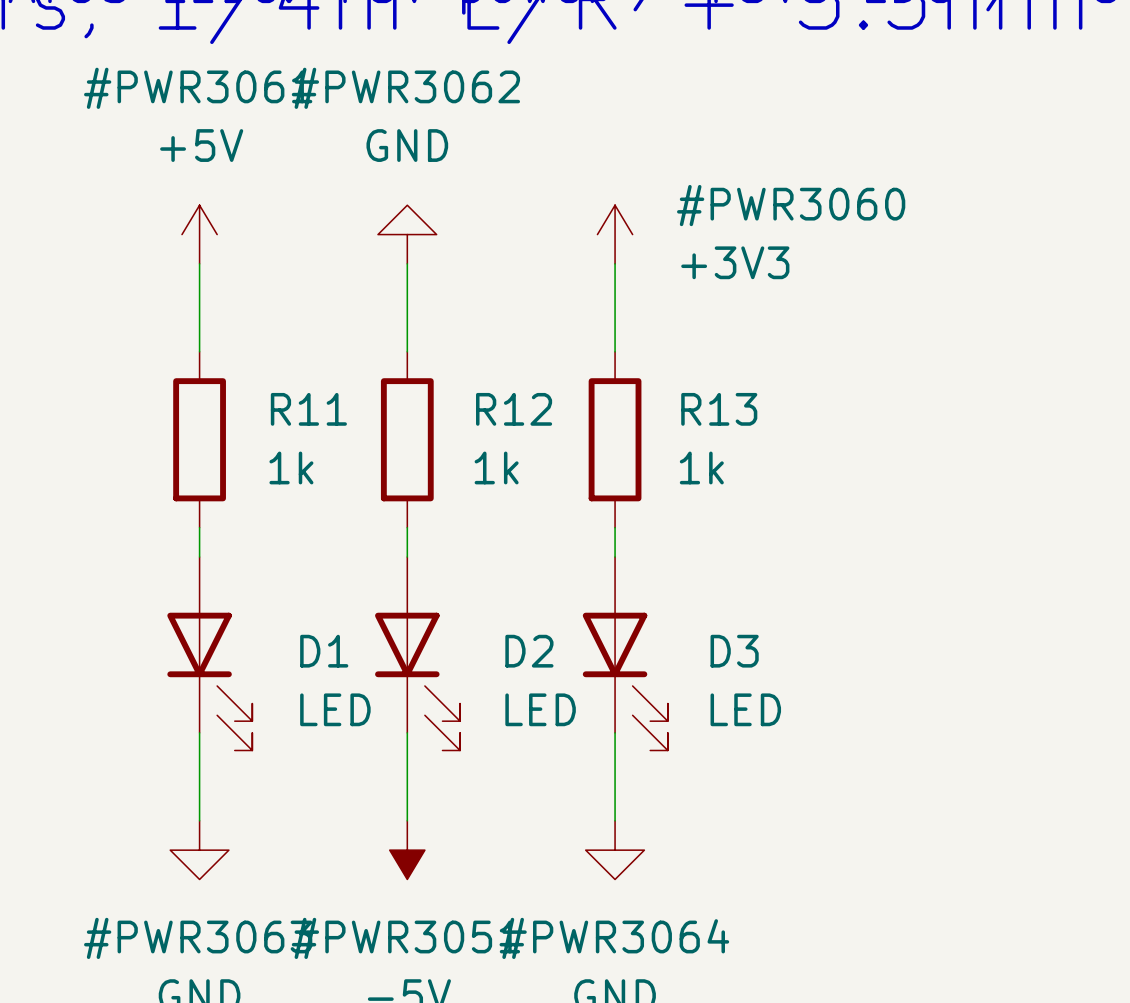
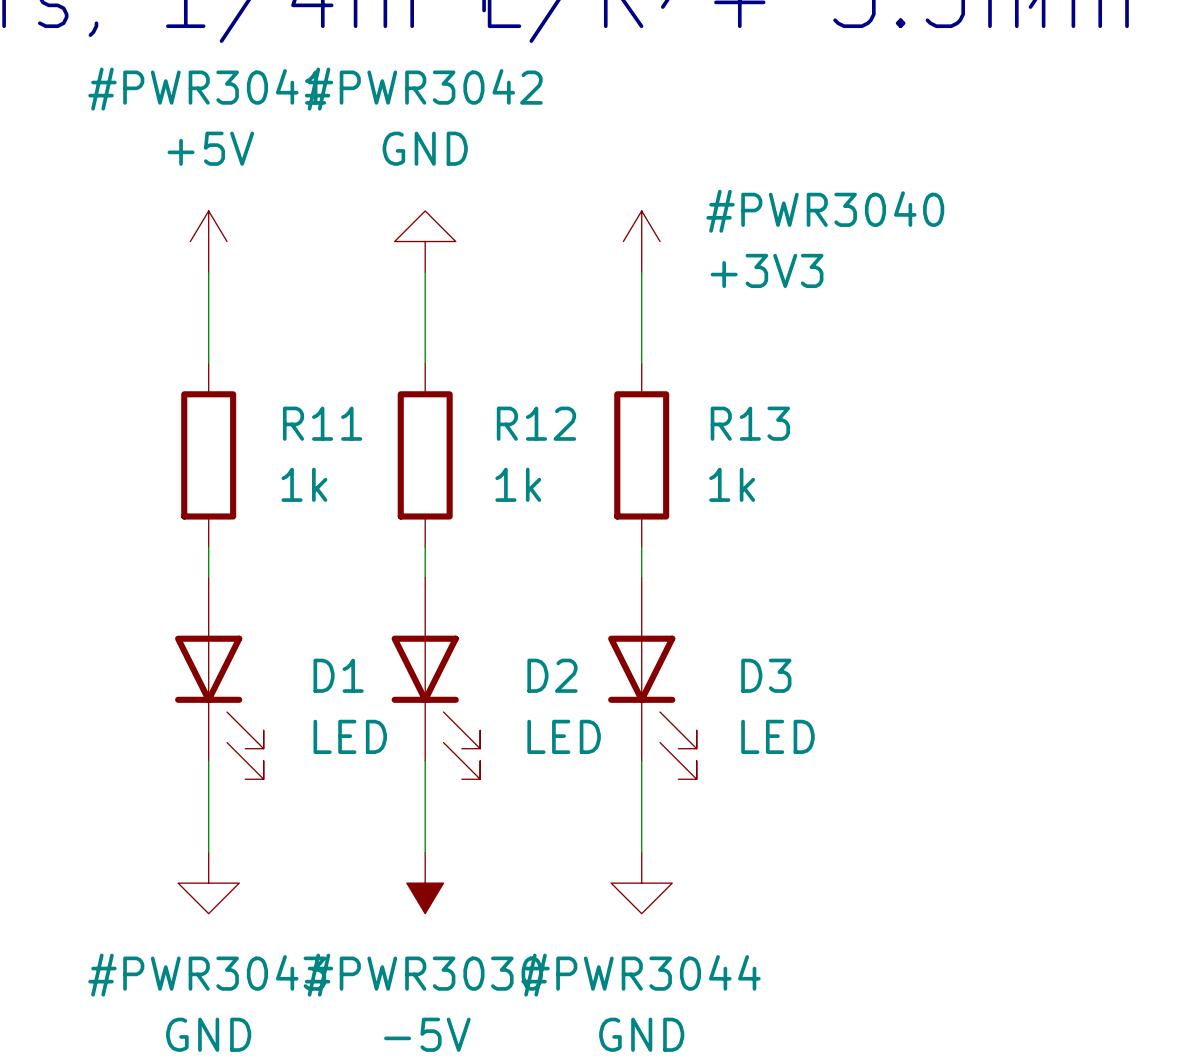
#PWR3061 name: #PWR3061 (198, 88) -> #PWR3041 (207, 89)
#PWR3062 name: #PWR3062 (405, 88) -> #PWR3042 (423, 89)
#PWR3060 name: #PWR3060 (791, 205) -> #PWR3040 (825, 211)
#PWR3063 name: #PWR3063 (198, 938) -> #PWR3043 (207, 975)
#PWR3051 name: #PWR3051 (405, 938) -> #PWR3030 (423, 975)
#PWR3064 name: #PWR3064 (614, 938) -> #PWR3044 (640, 975)

